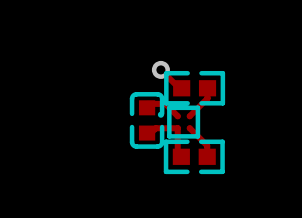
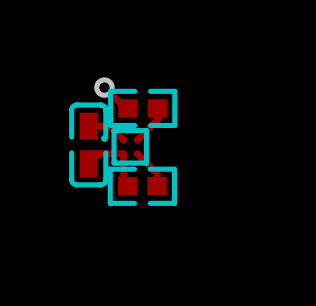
part footprint: [129, 92, 165, 149] -> [69, 102, 109, 188]

